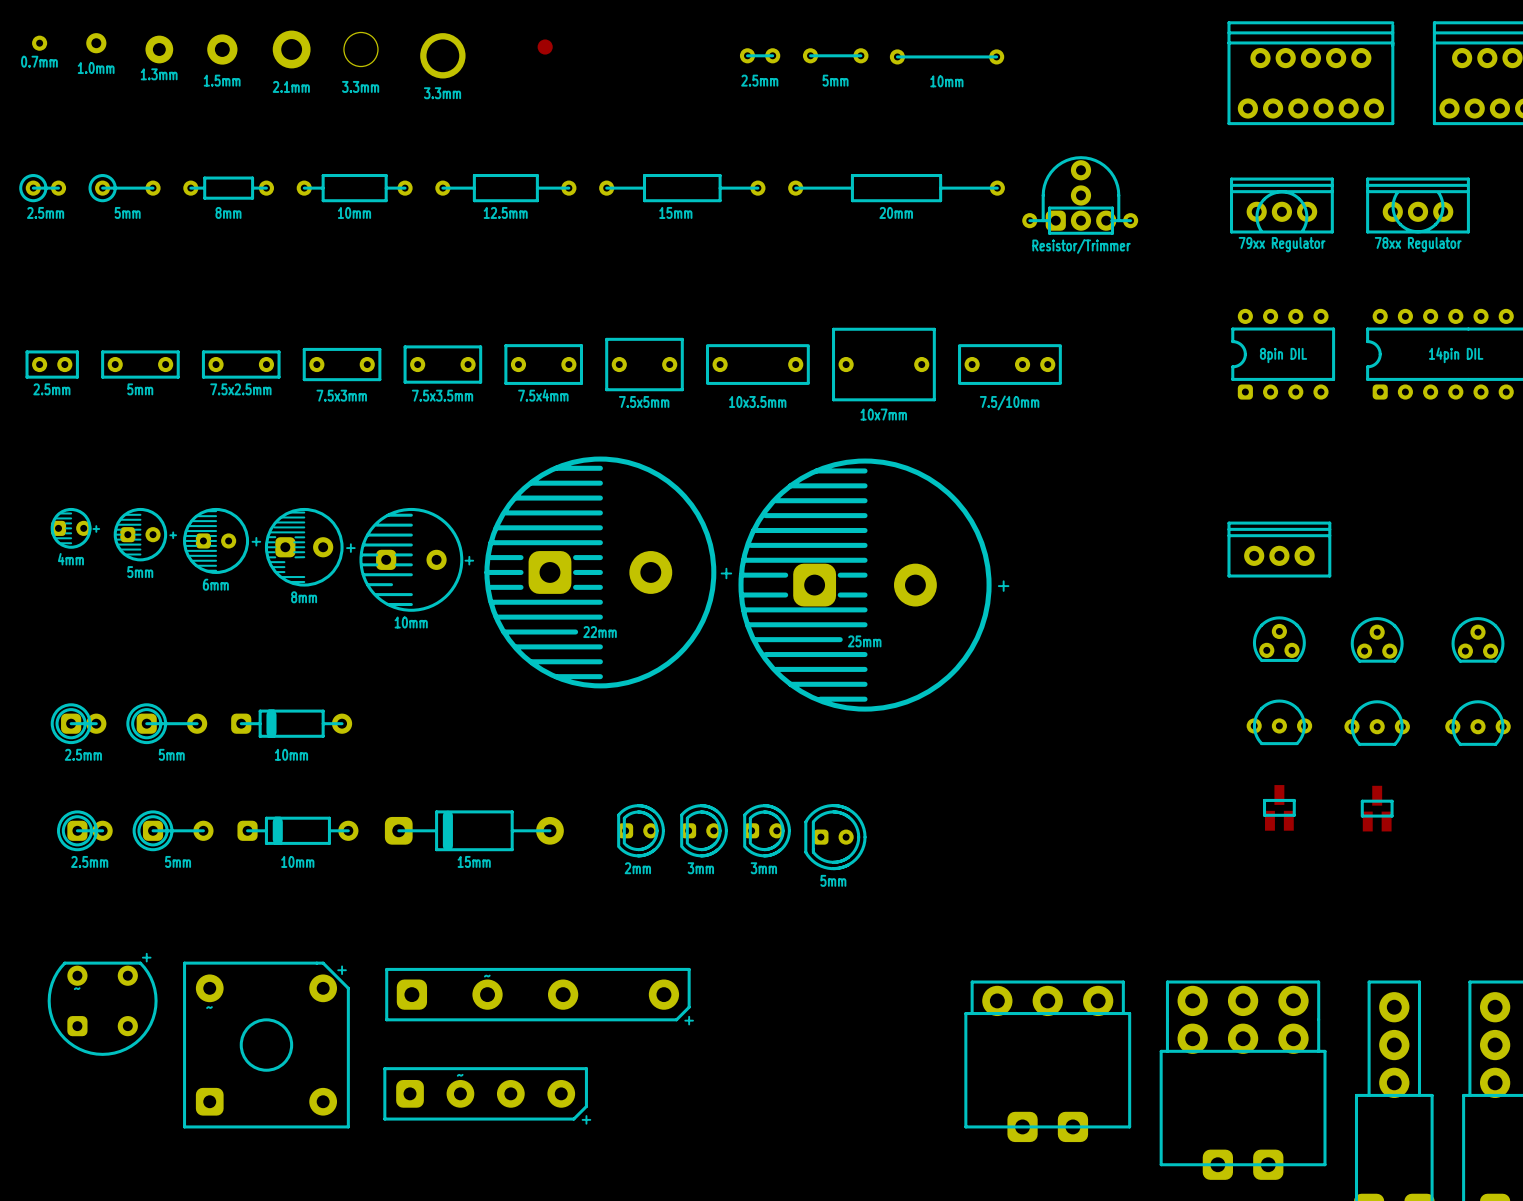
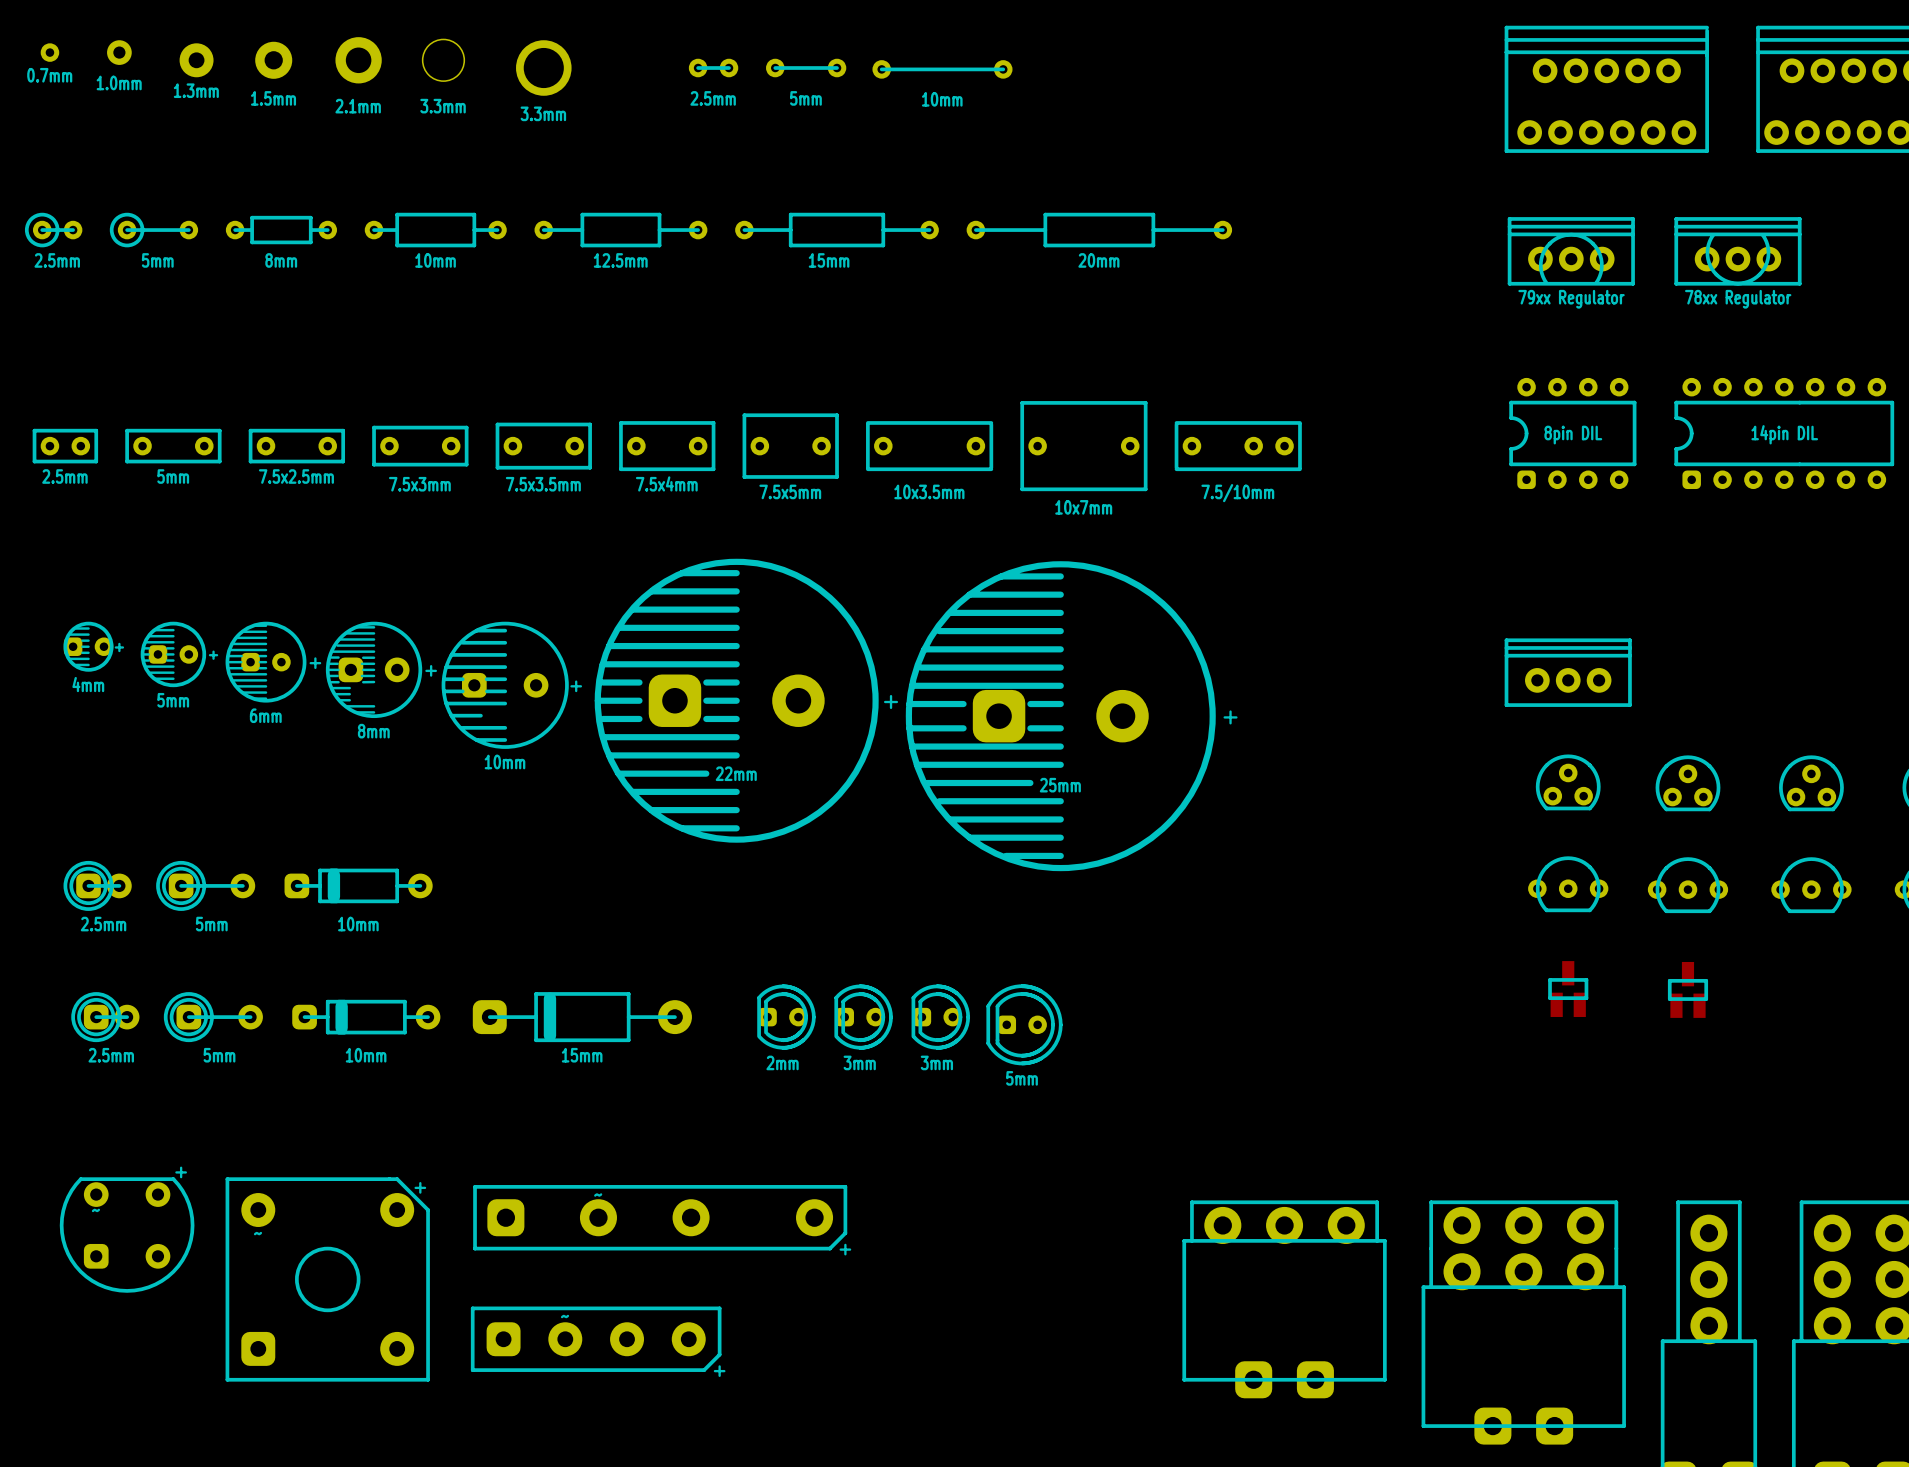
part: (545, 47) -> none
2.5mm position: (760, 55) -> (713, 68)
5mm position: (835, 55) -> (806, 68)
10mm position: (947, 56) -> (942, 69)
Resistor/Trimmer: (1080, 195) -> none

